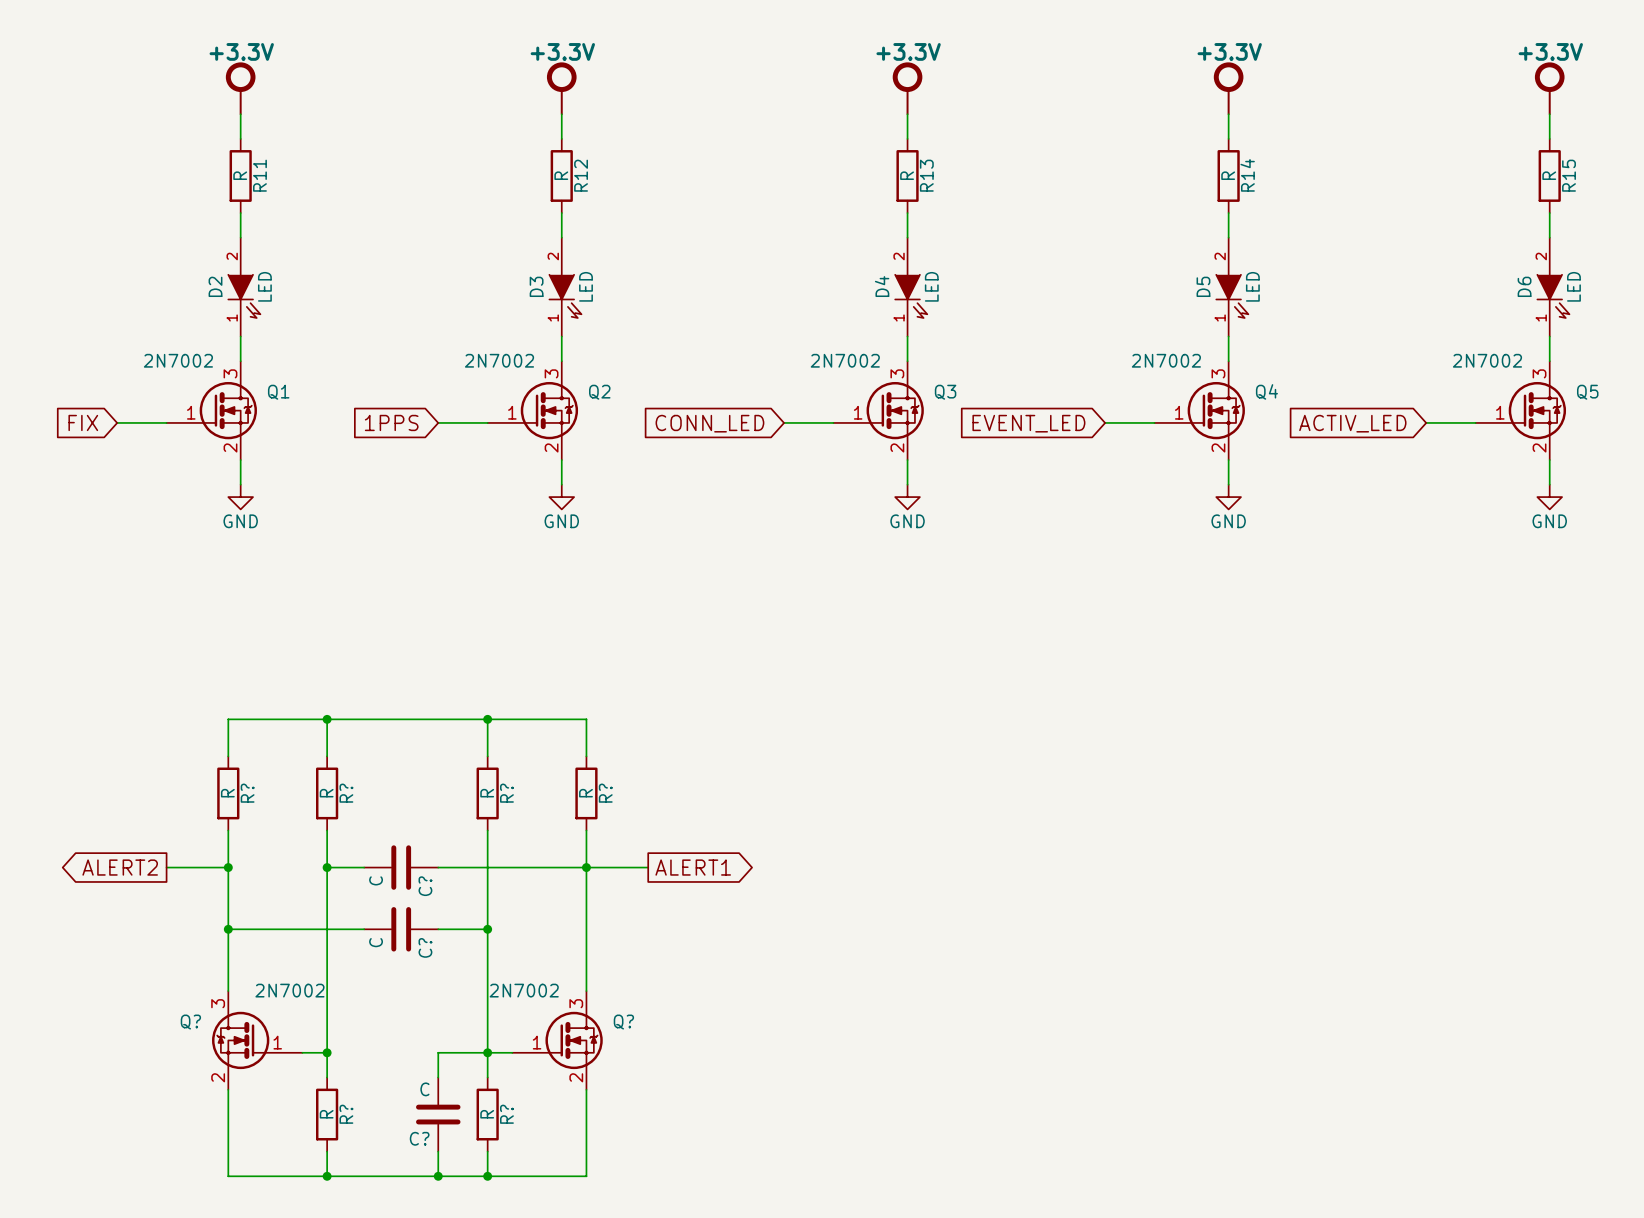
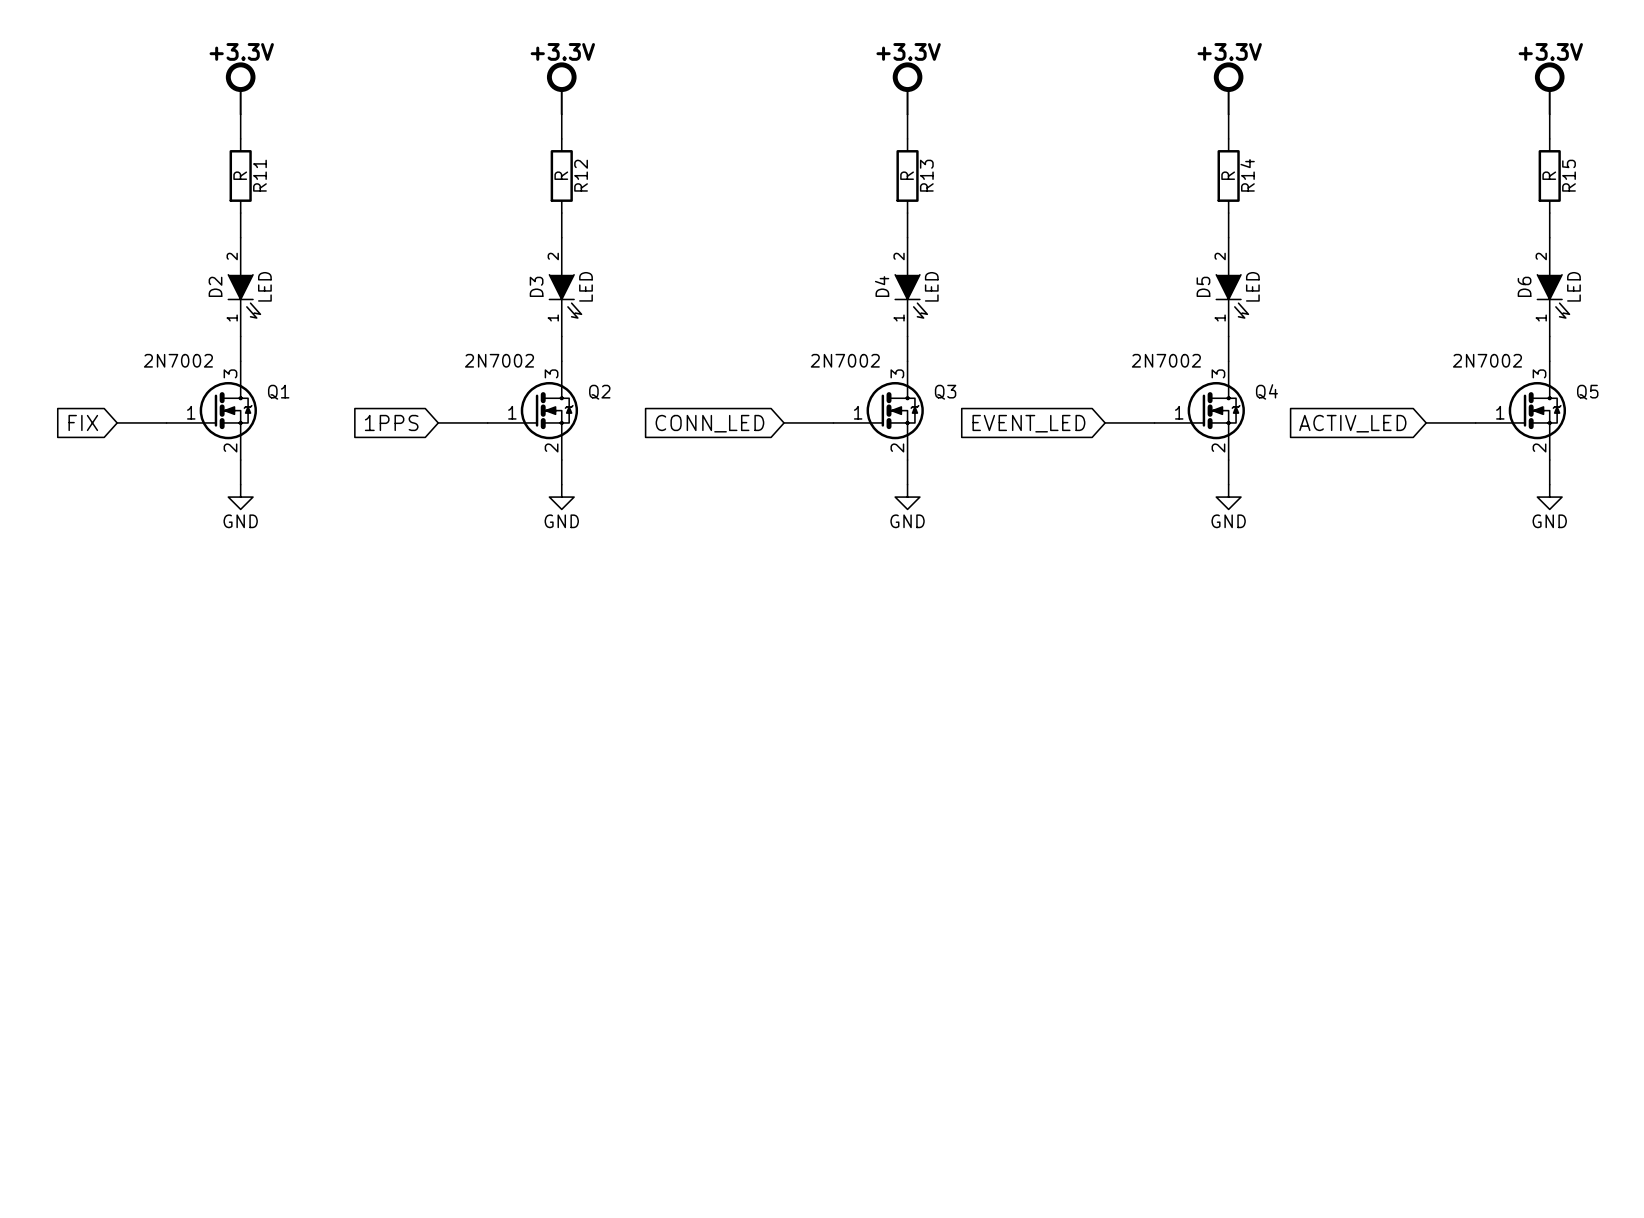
wire: (327, 719) (327, 756) -> none
junction: (327, 719) -> none
wire: (487, 719) (487, 756) -> none
junction: (487, 719) -> none
wire: (228, 756) (228, 719) (586, 719) (586, 756) -> none
R?: R (228, 793) -> none
R?: R (327, 793) -> none
R?: R (487, 793) -> none
R?: R (586, 793) -> none
wire: (228, 830) (228, 991) -> none
wire: (327, 830) (327, 1077) -> none
wire: (487, 830) (487, 1077) -> none
wire: (586, 830) (586, 991) -> none
global label: ALERT2 (120, 867) -> none
wire: (166, 867) (228, 867) -> none
junction: (228, 867) -> none
wire: (327, 867) (364, 867) -> none
junction: (327, 867) -> none
C?: C (401, 867) -> none
wire: (438, 867) (648, 867) -> none
junction: (586, 867) -> none
global label: ALERT1 (693, 867) -> none
wire: (228, 929) (364, 929) -> none
junction: (228, 929) -> none
C?: C (401, 929) -> none
wire: (438, 929) (487, 929) -> none
junction: (487, 929) -> none
Q?: 2N7002 (257, 1040) -> none
Q?: 2N7002 (557, 1040) -> none
wire: (302, 1052) (327, 1052) -> none
junction: (327, 1052) -> none
junction: (487, 1052) -> none
wire: (512, 1052) (438, 1052) (438, 1077) -> none
wire: (228, 1089) (228, 1176) (586, 1176) (586, 1089) -> none
R?: R (327, 1114) -> none
C?: C (438, 1114) -> none
R?: R (487, 1114) -> none
wire: (327, 1151) (327, 1176) -> none
wire: (438, 1151) (438, 1176) -> none
wire: (487, 1151) (487, 1176) -> none
junction: (327, 1176) -> none
junction: (438, 1176) -> none
junction: (487, 1176) -> none

